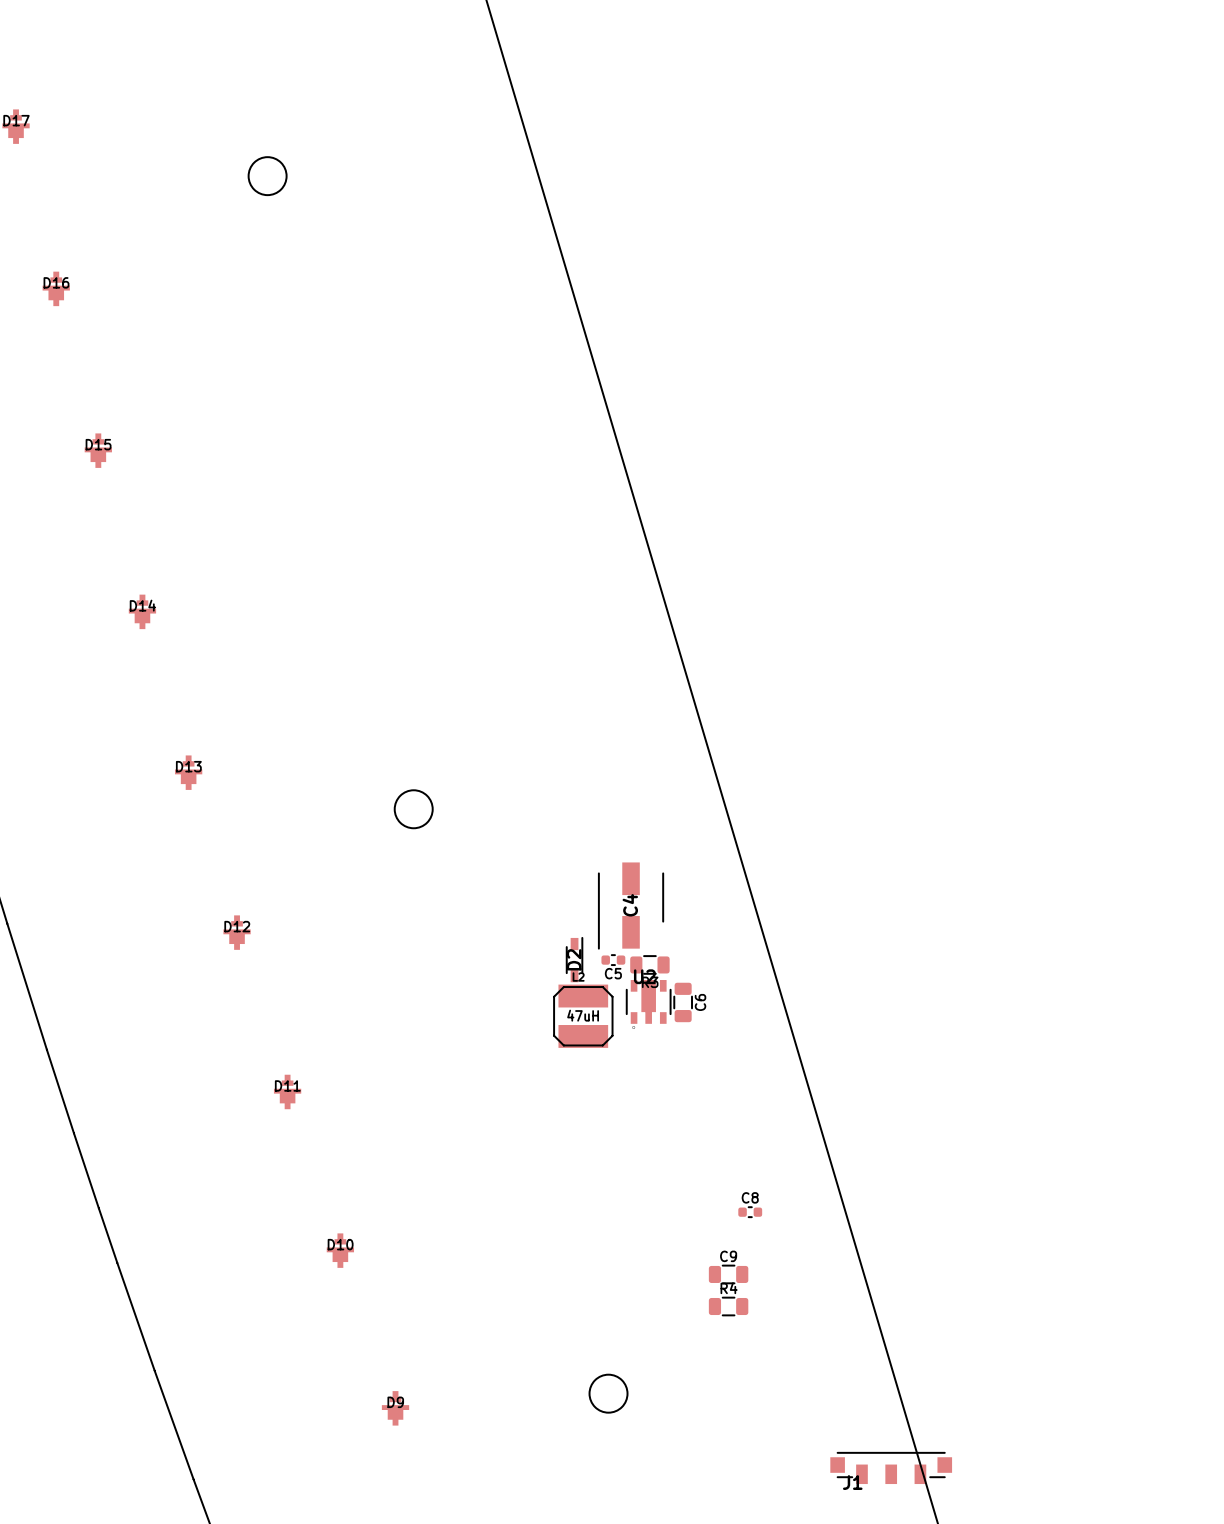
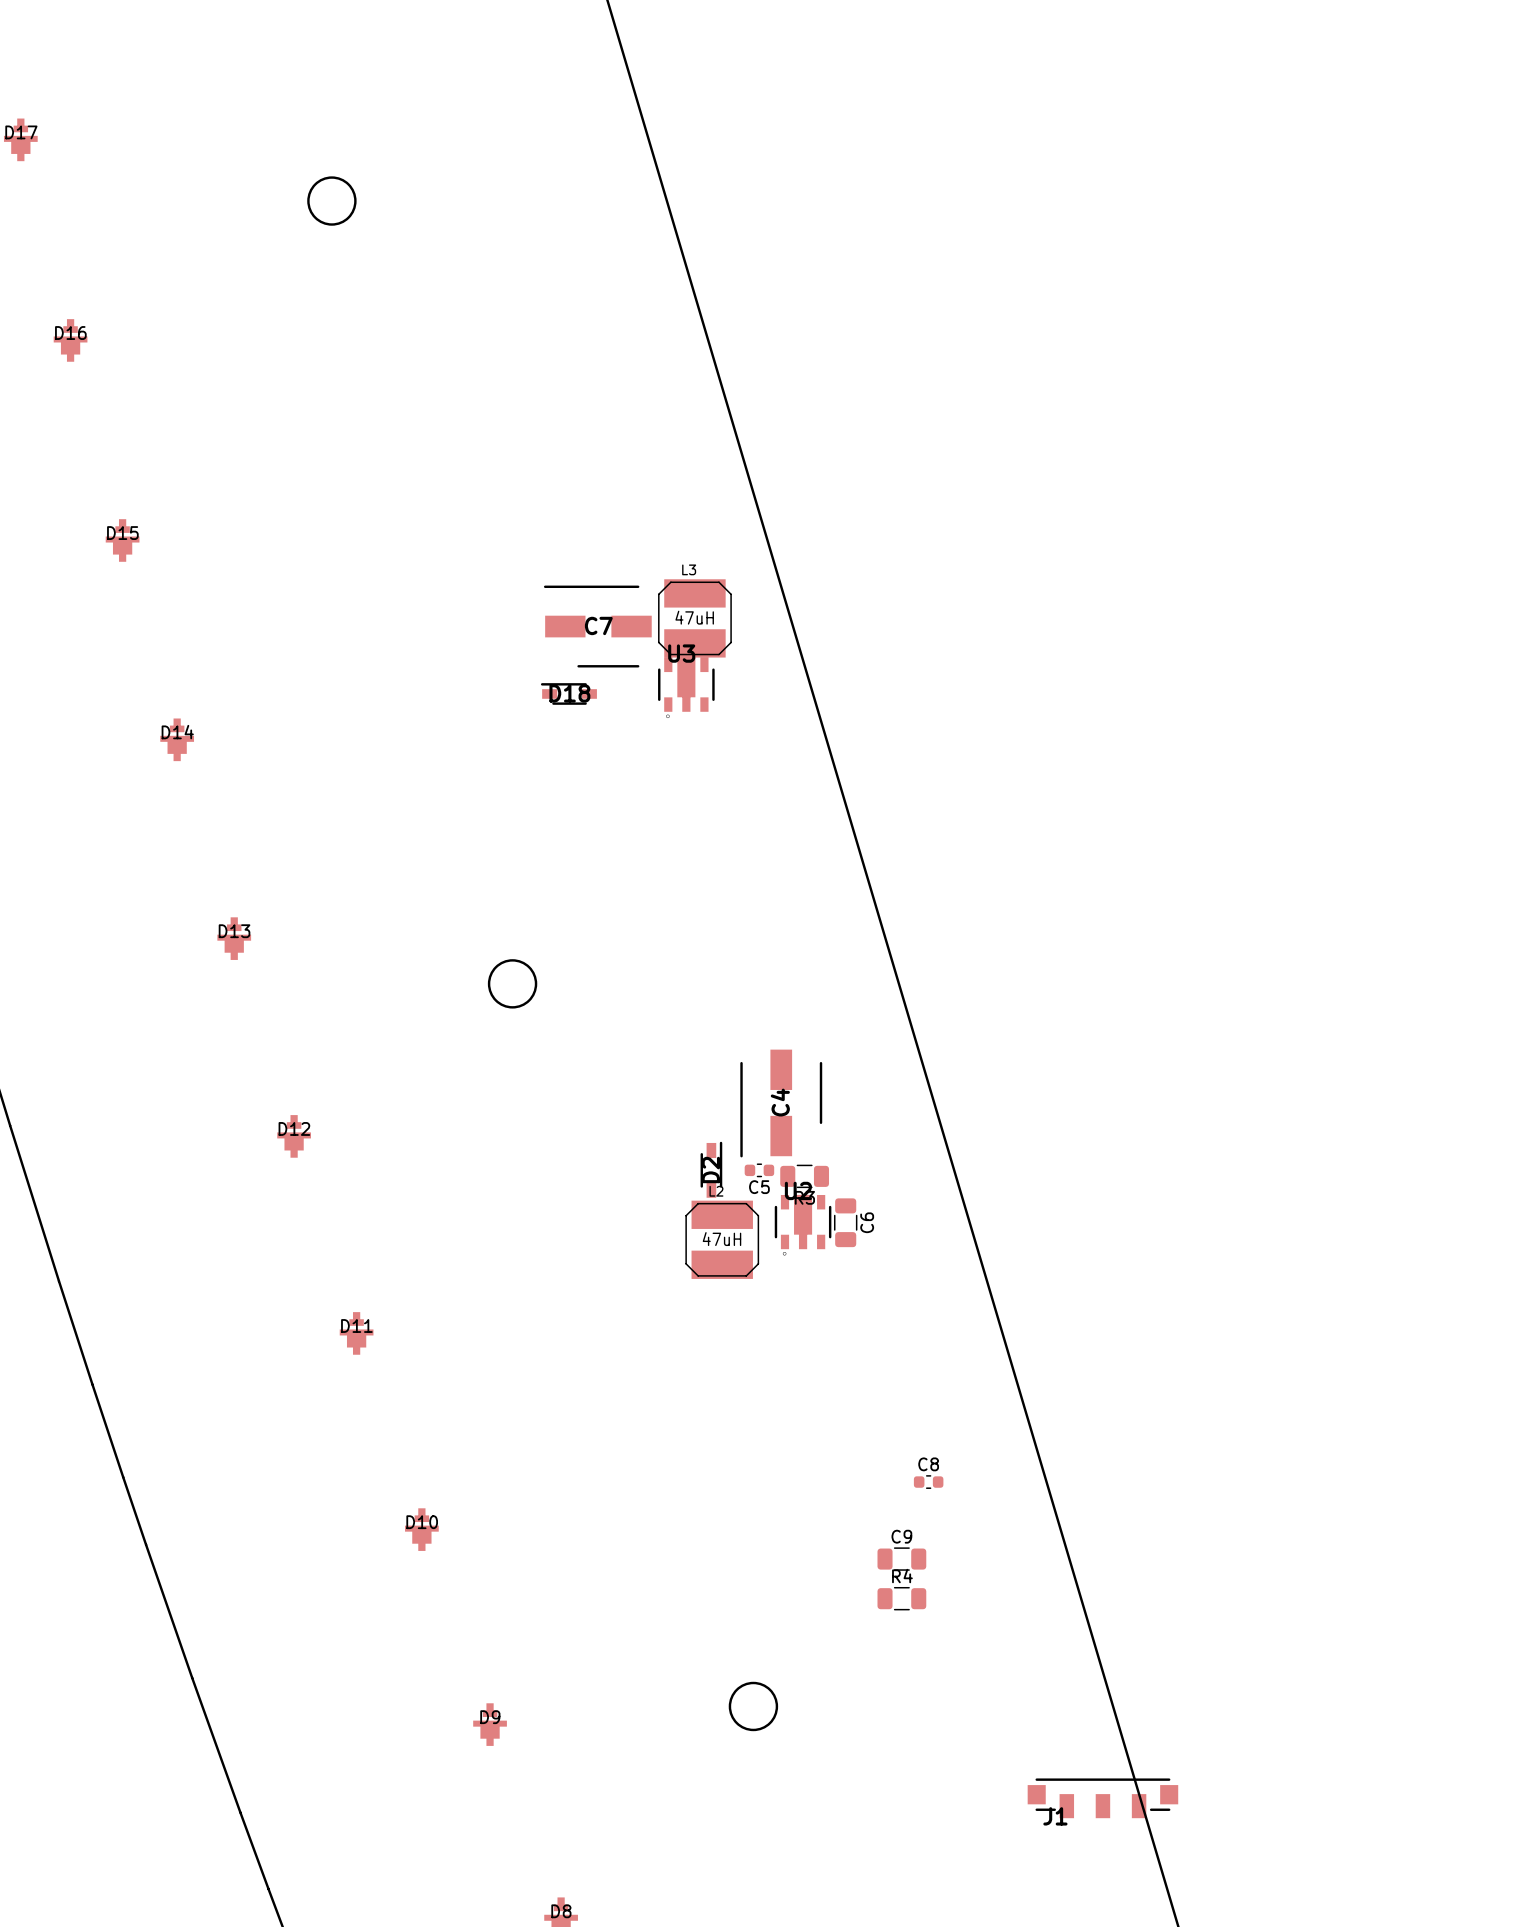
L3: none -> 47uH (694, 618)
C7: none -> (597, 626)
U3: none -> (686, 687)
D18: none -> (568, 693)

